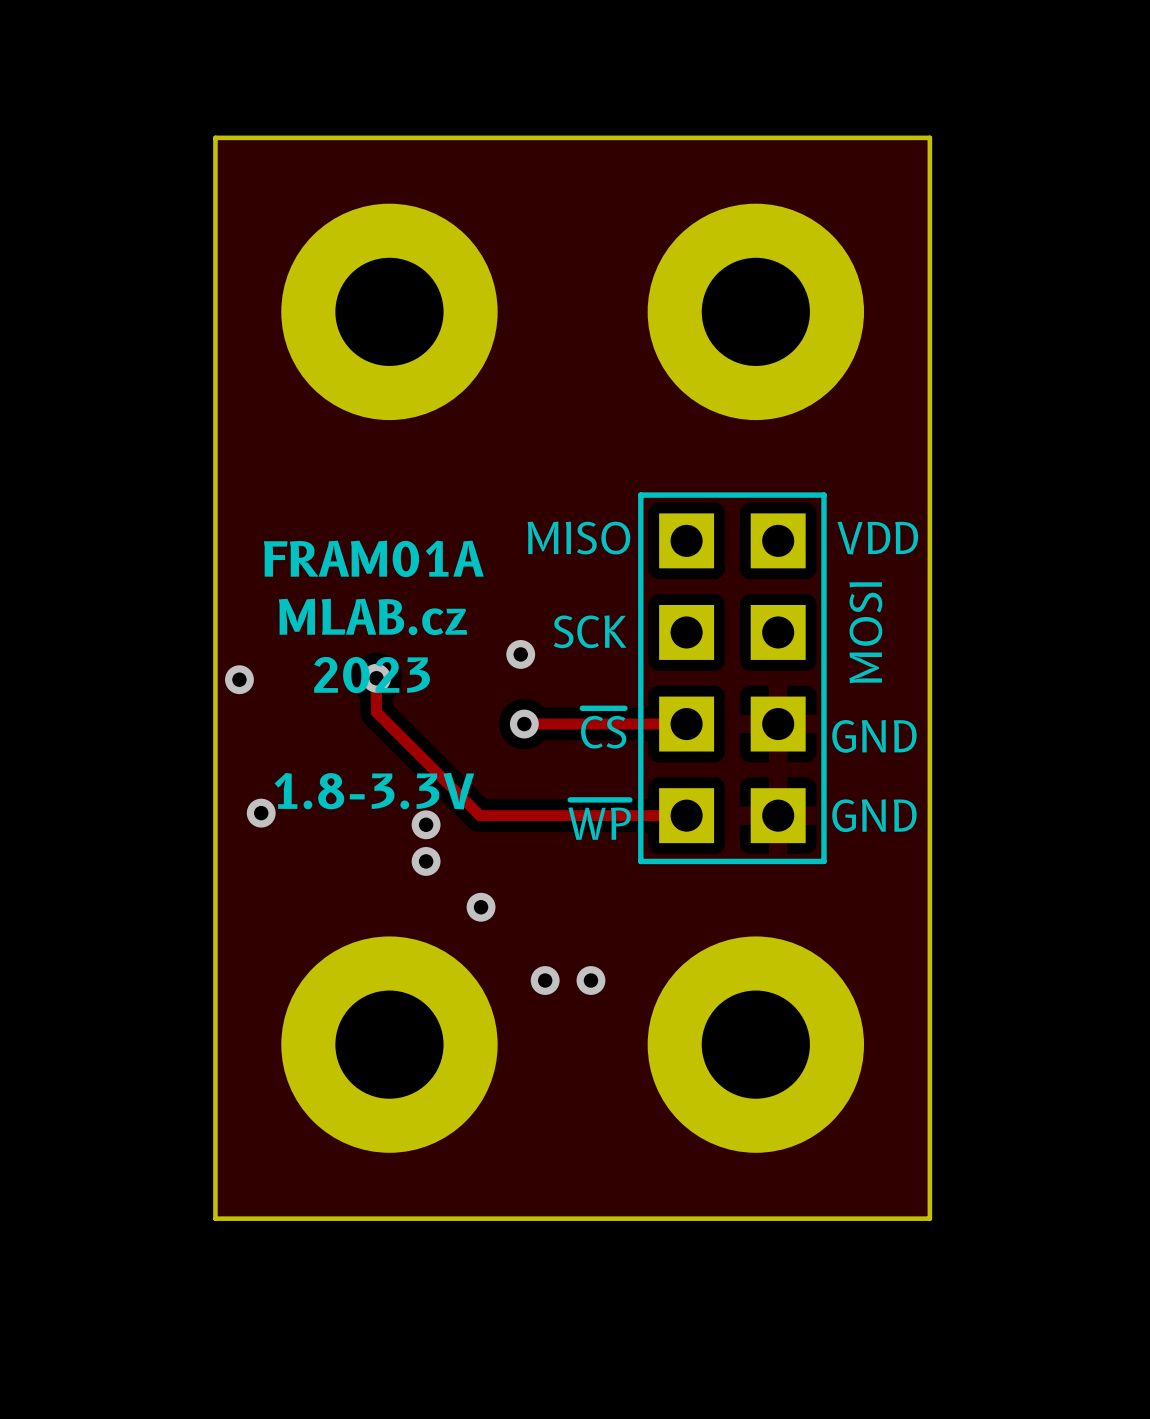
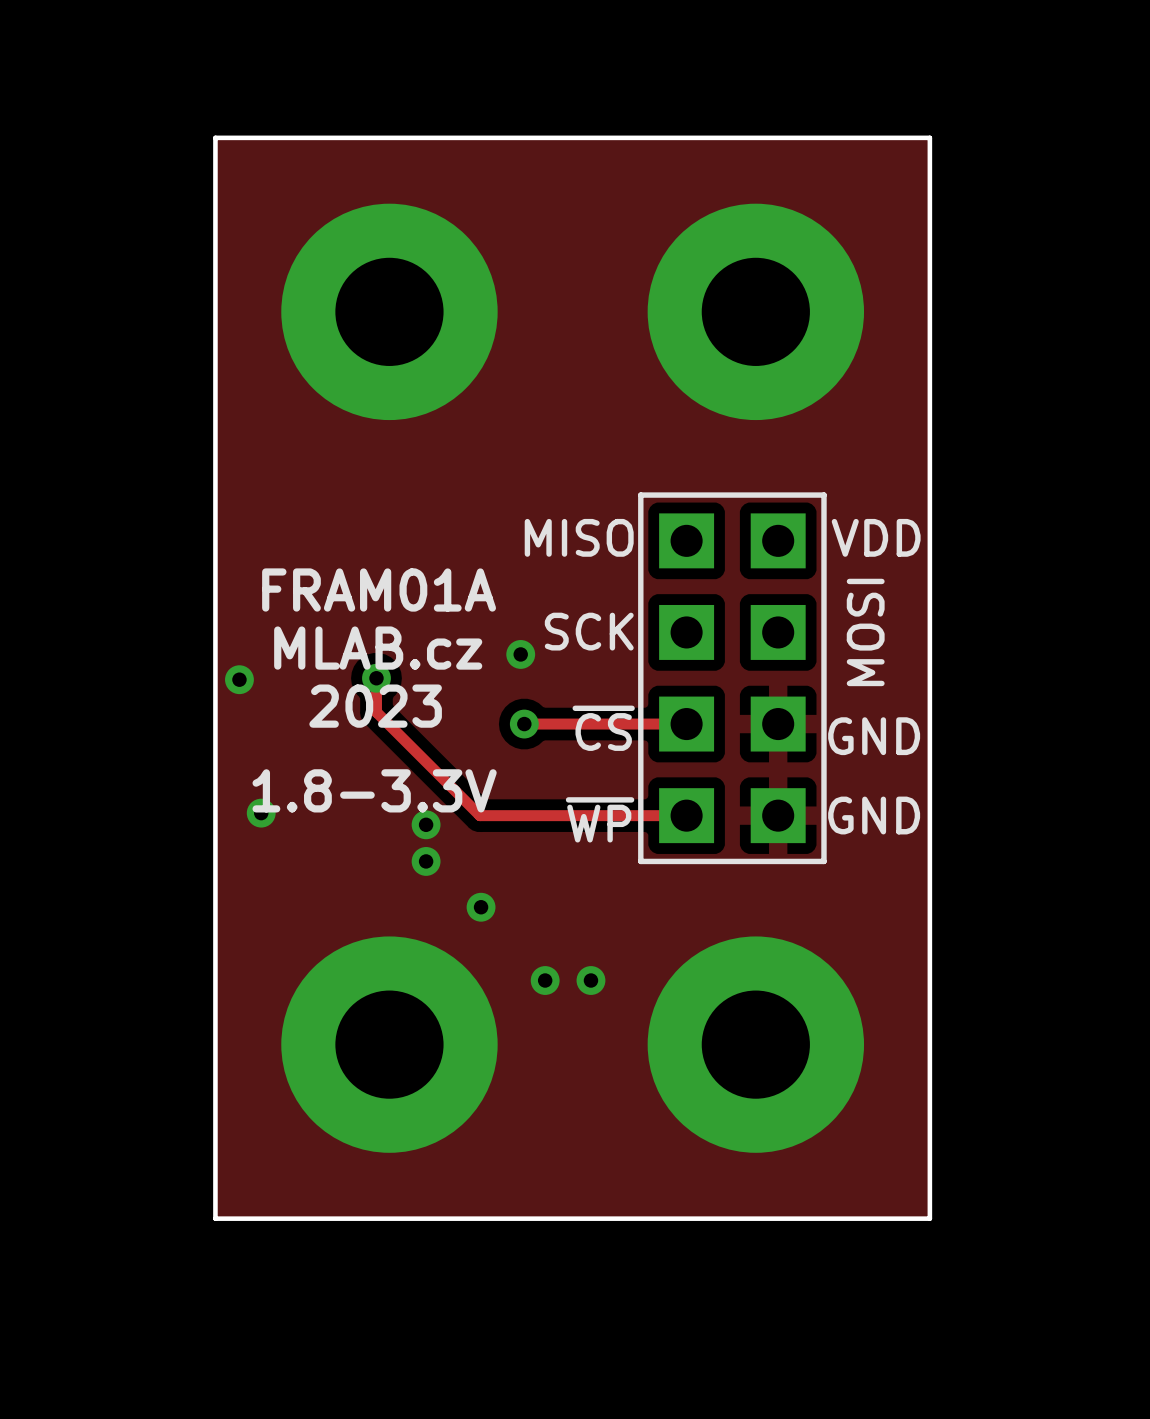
text position: FRAM01A (373, 558) -> FRAM01A (379, 590)
text position: MLAB.cz (373, 616) -> MLAB.cz (378, 648)
text position: 2023 (372, 675) -> 2023 (375, 706)

